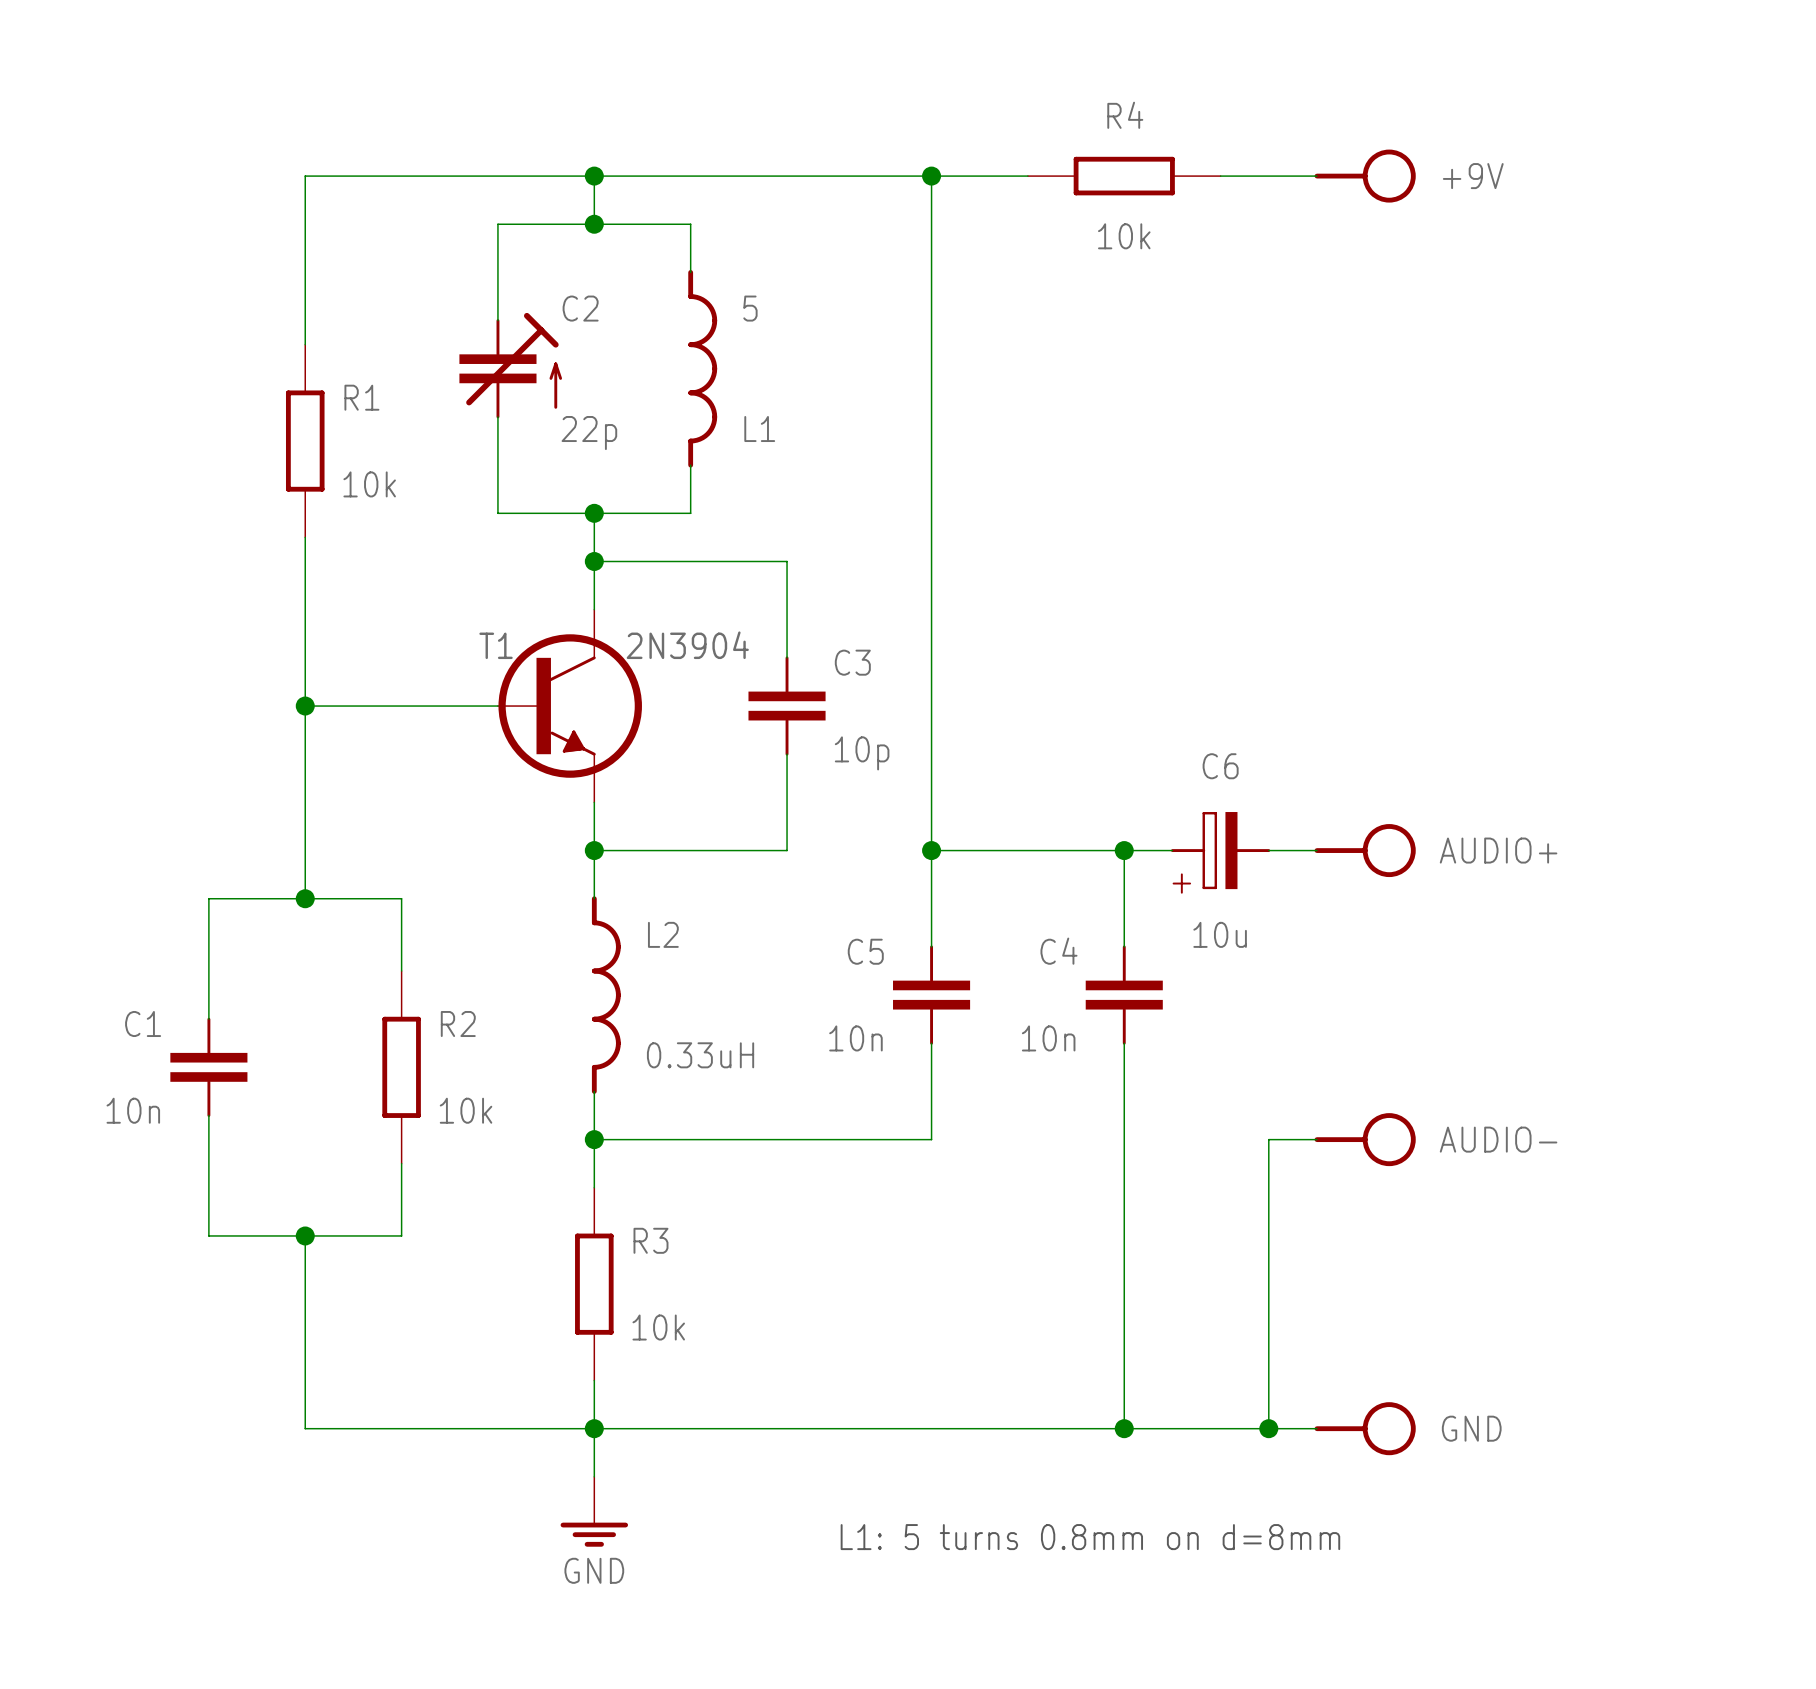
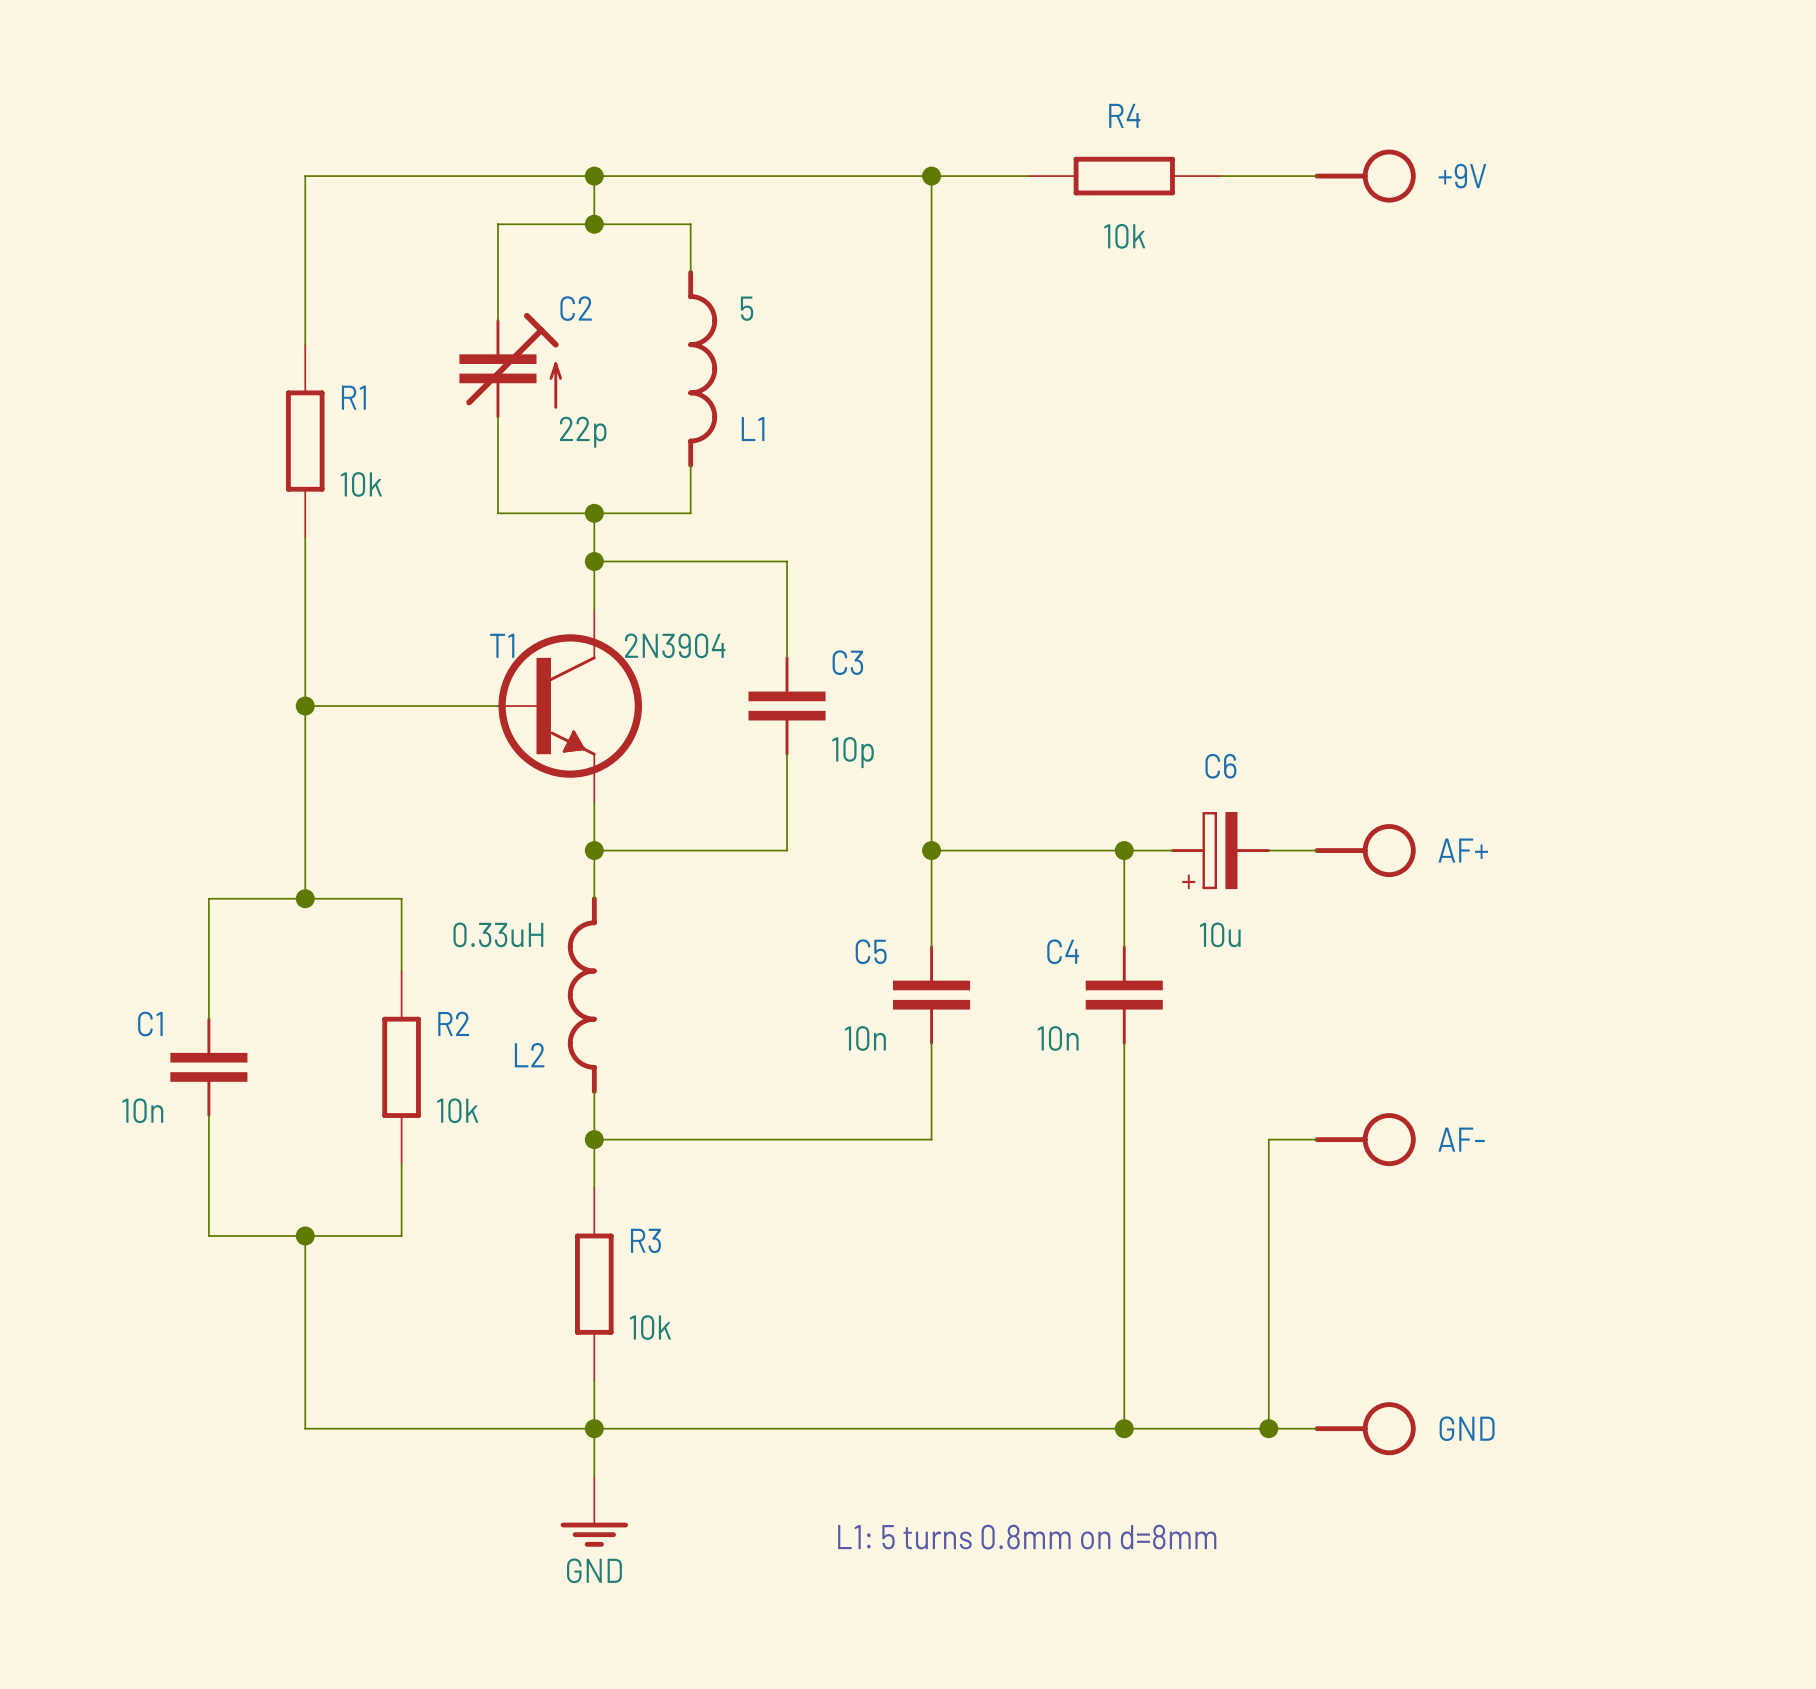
AUDIO+ name: AUDIO+ (1498, 850) -> AF+ (1463, 850)
L2 rotation: 0° (606, 995) -> 180° (582, 995)
AUDIO- name: AUDIO- (1498, 1139) -> AF- (1461, 1139)

